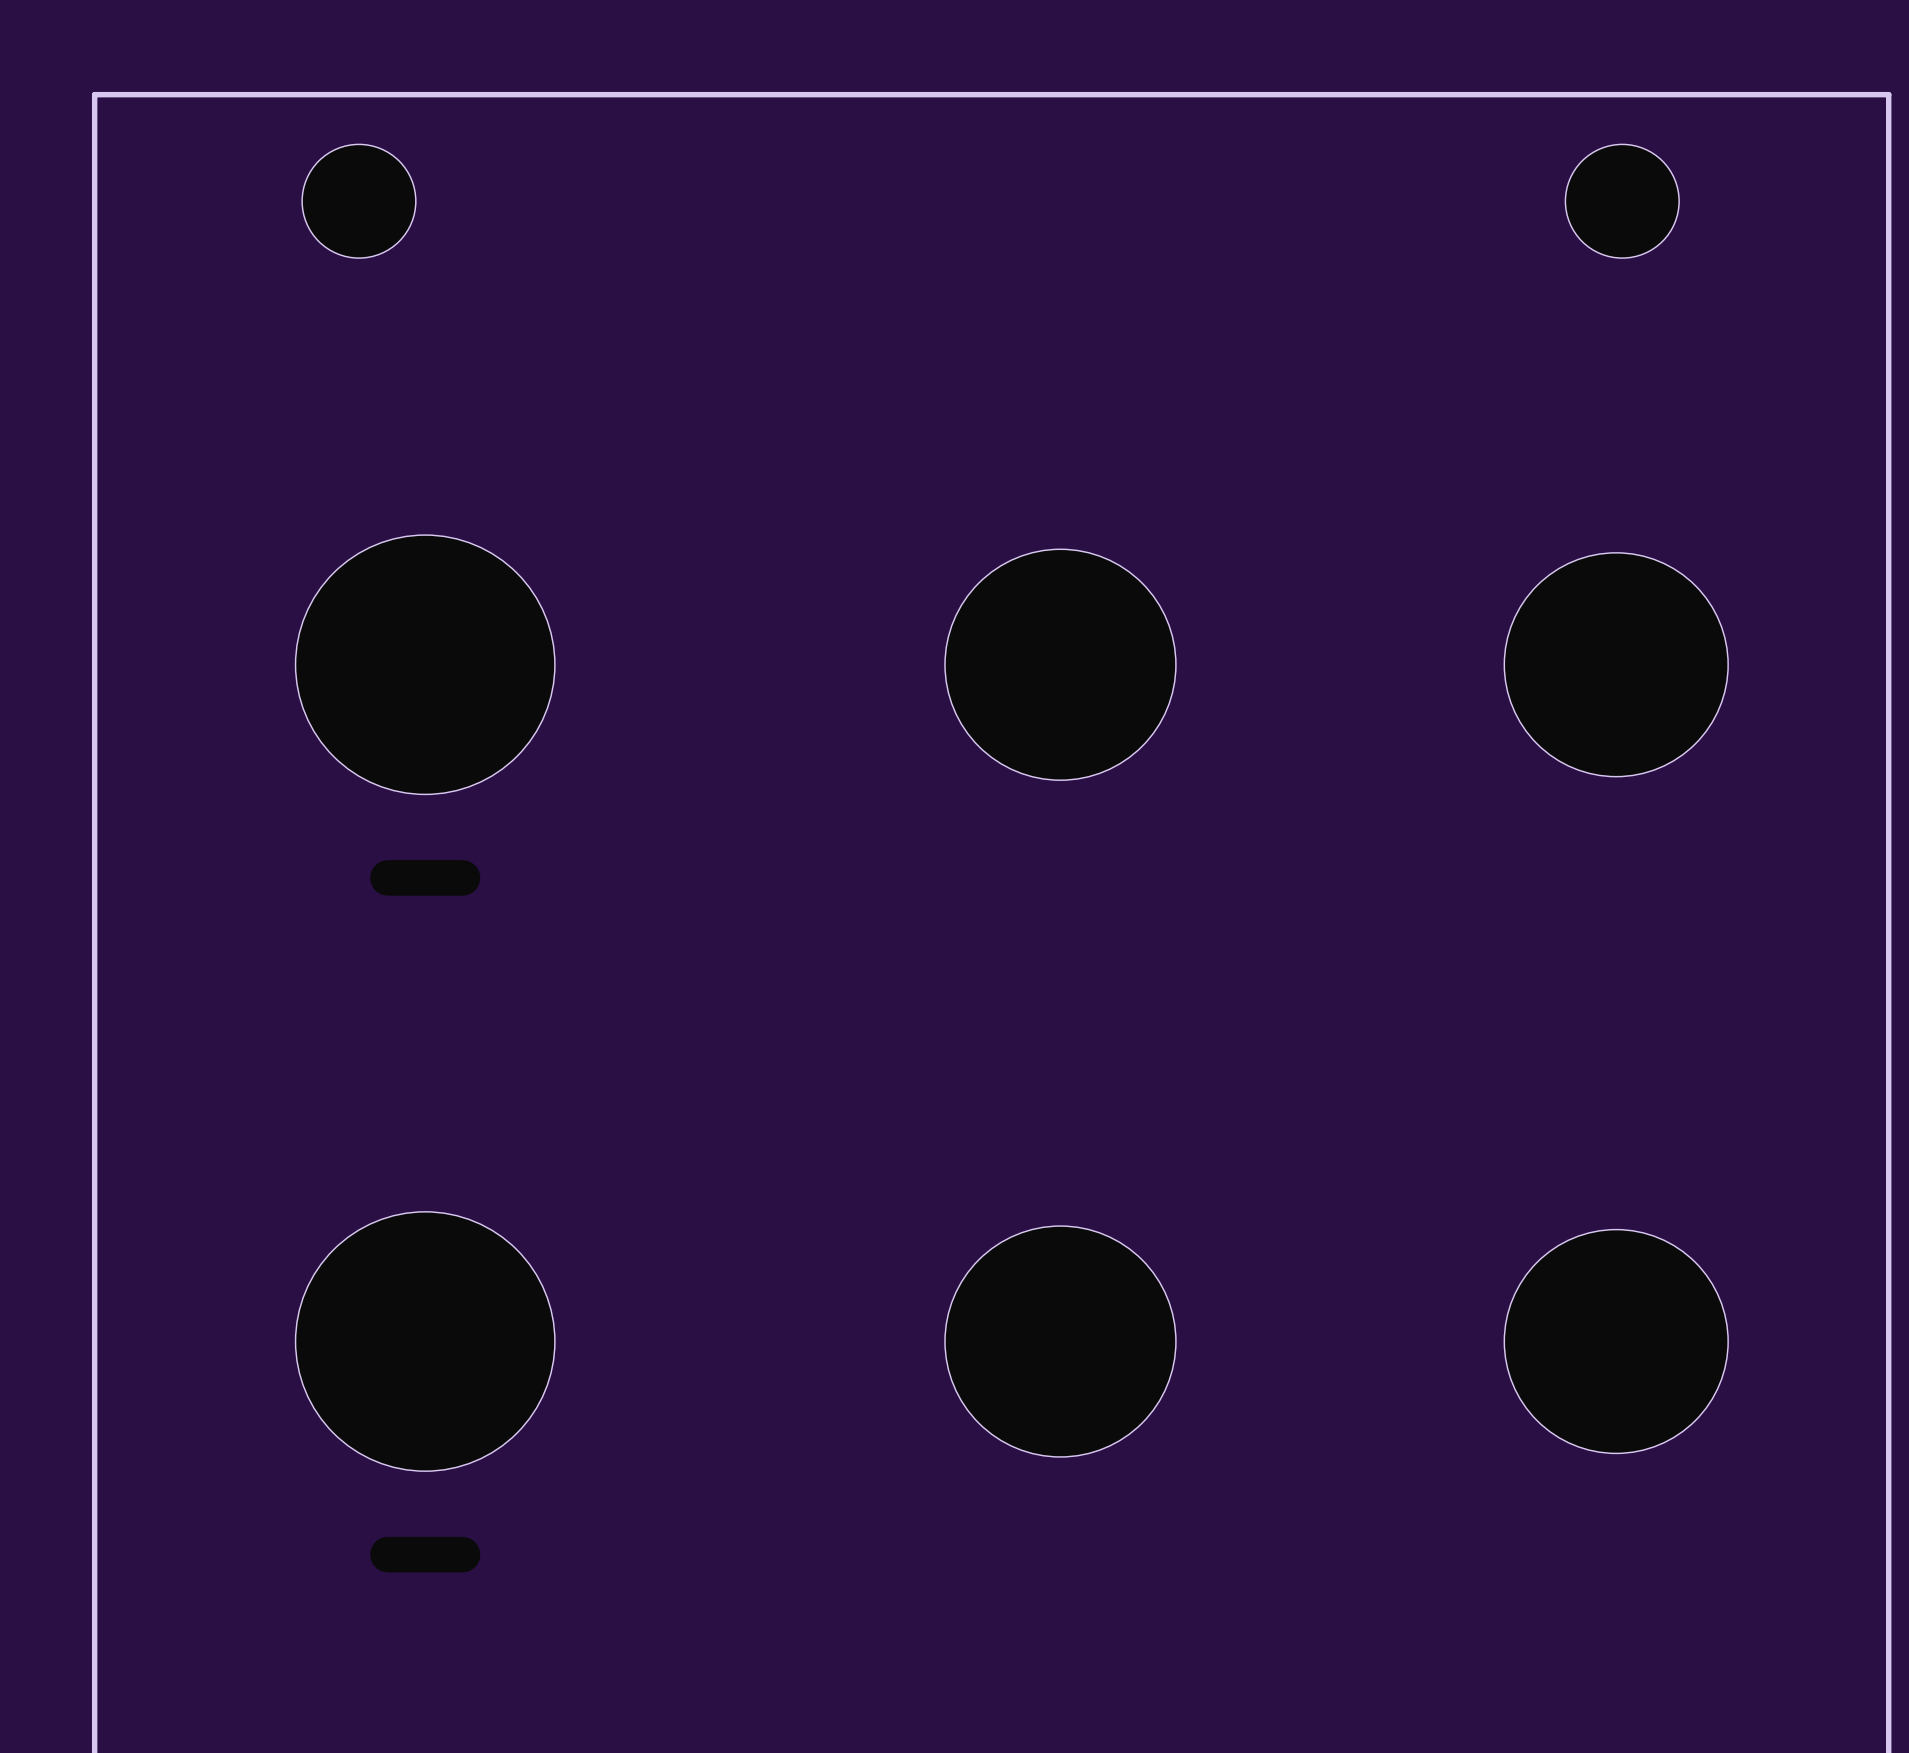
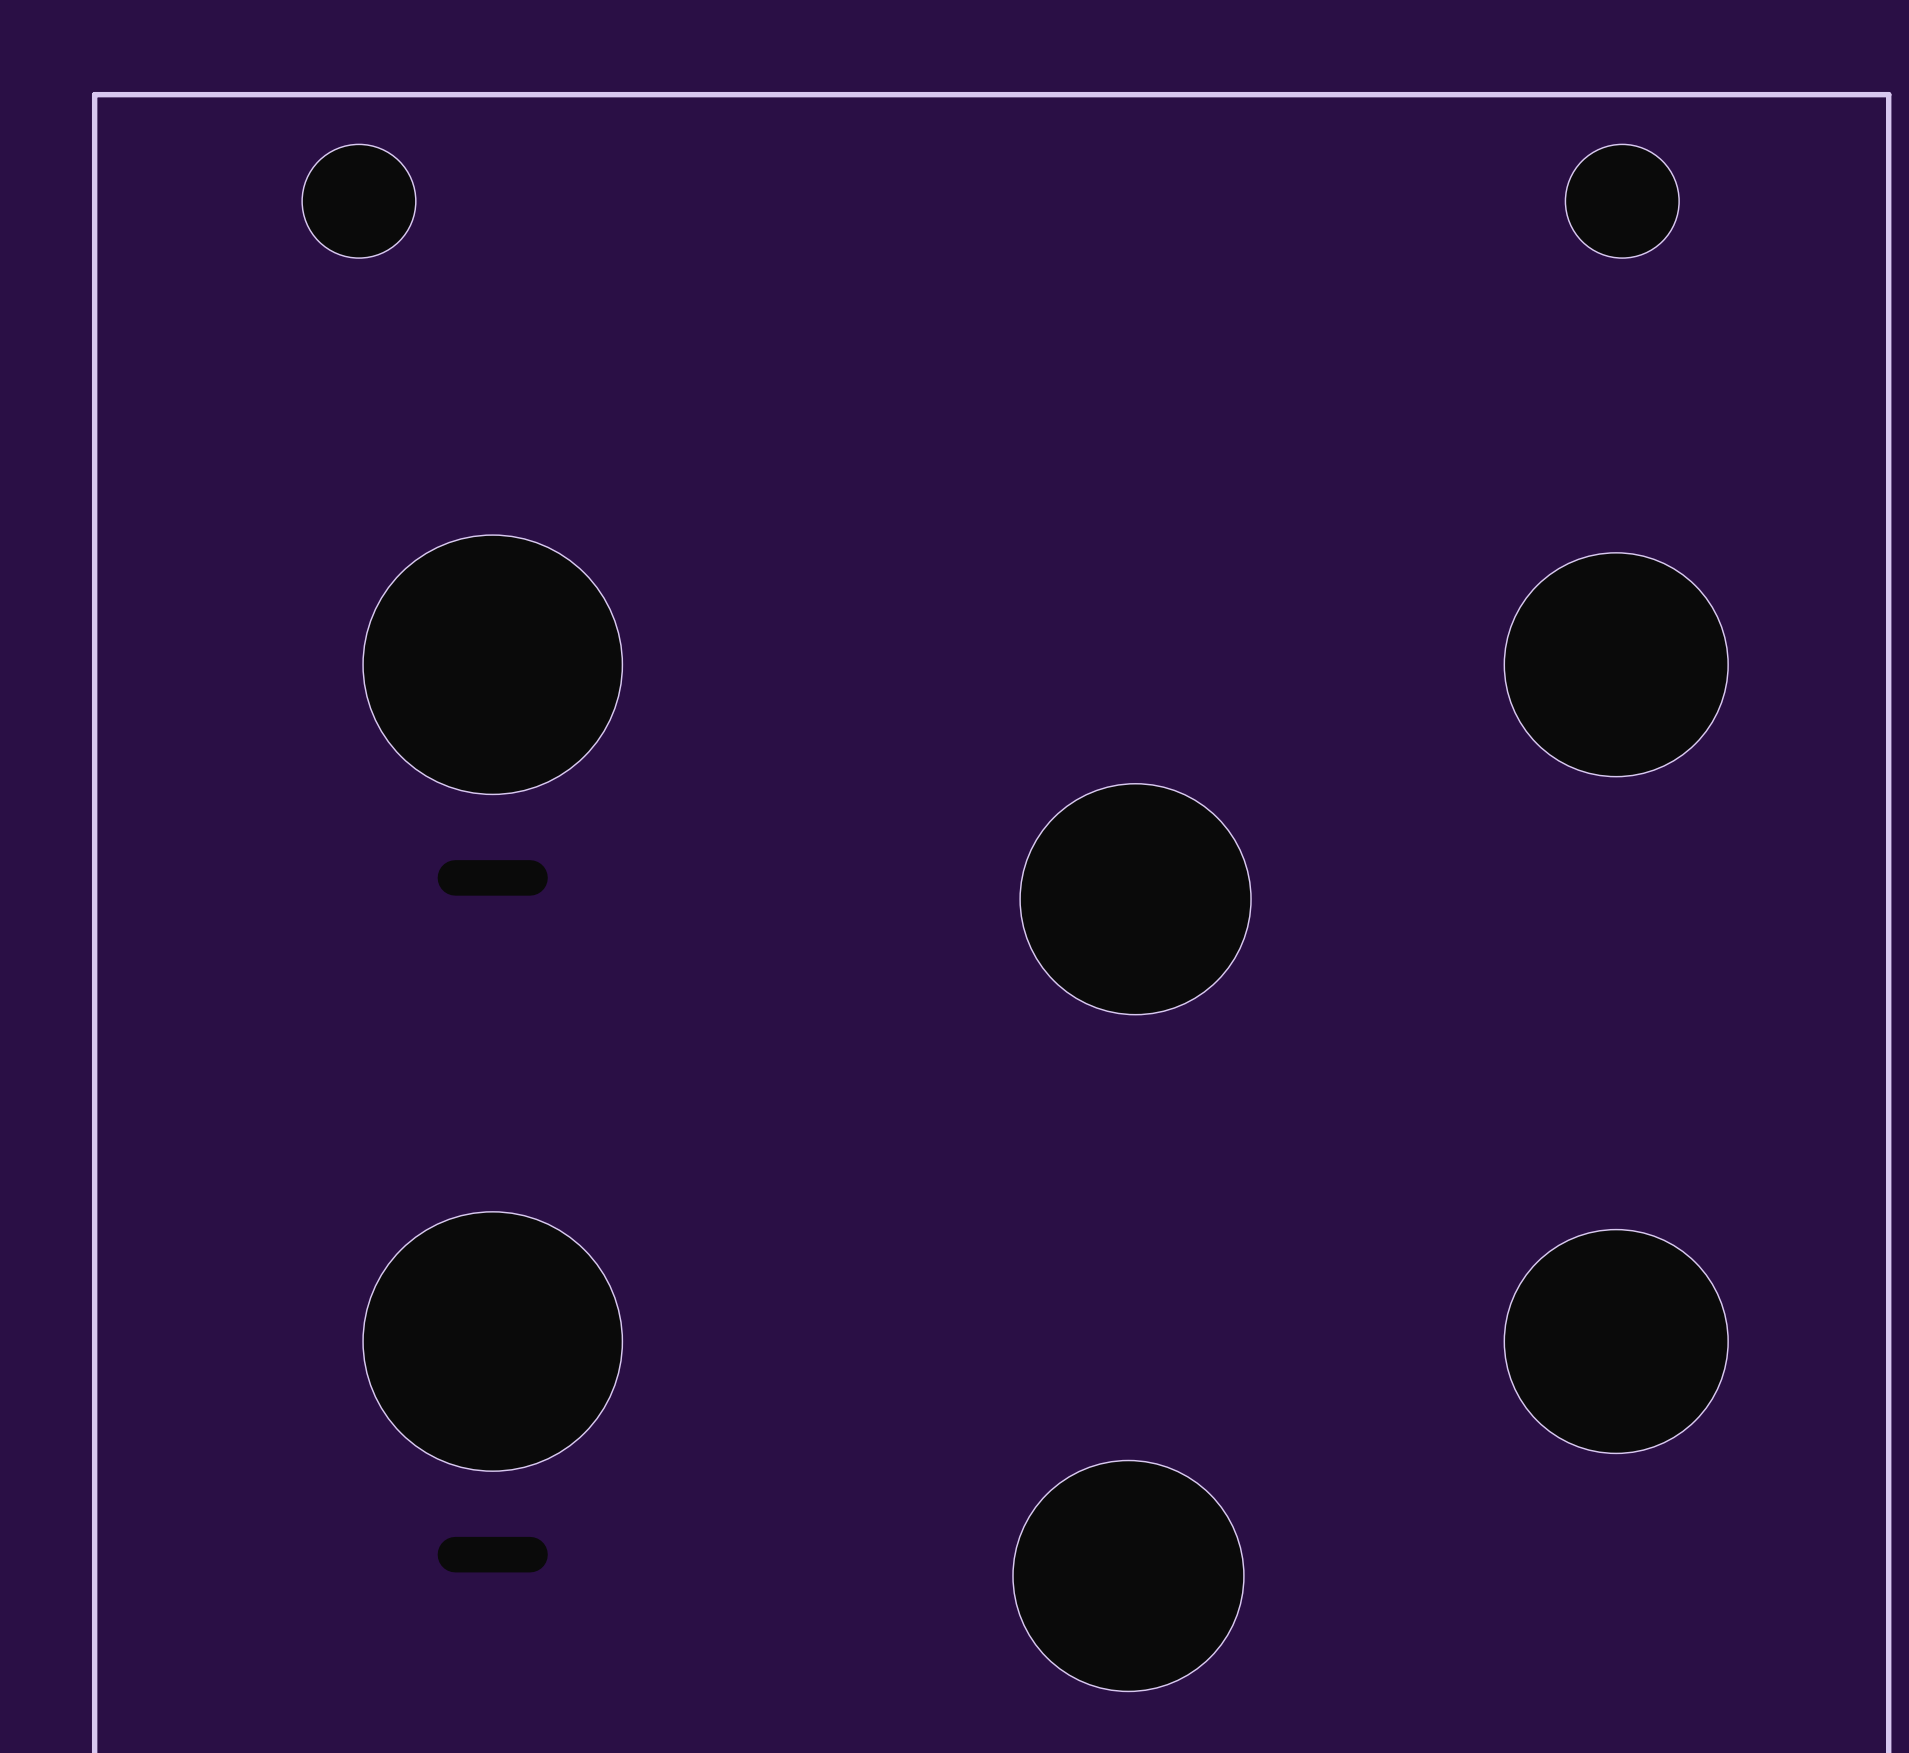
part: (1060, 664) -> none
part position: (425, 715) -> (492, 715)
part: none -> (1135, 899)
part: (1060, 1341) -> none
part position: (425, 1392) -> (492, 1392)
part: none -> (1128, 1575)

